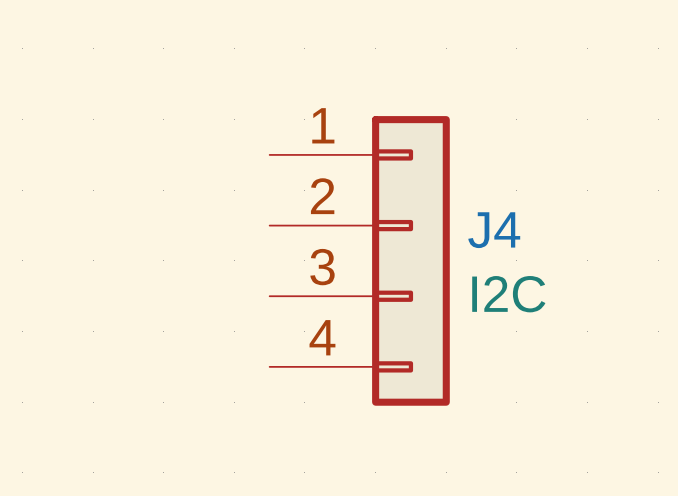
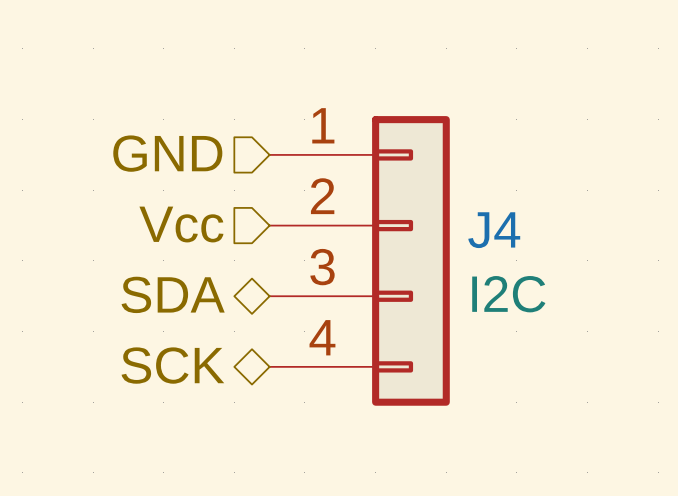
hierarchical label: none -> GND (167, 153)
hierarchical label: none -> Vcc (181, 224)
hierarchical label: none -> SDA (173, 294)
hierarchical label: none -> SCK (172, 365)

